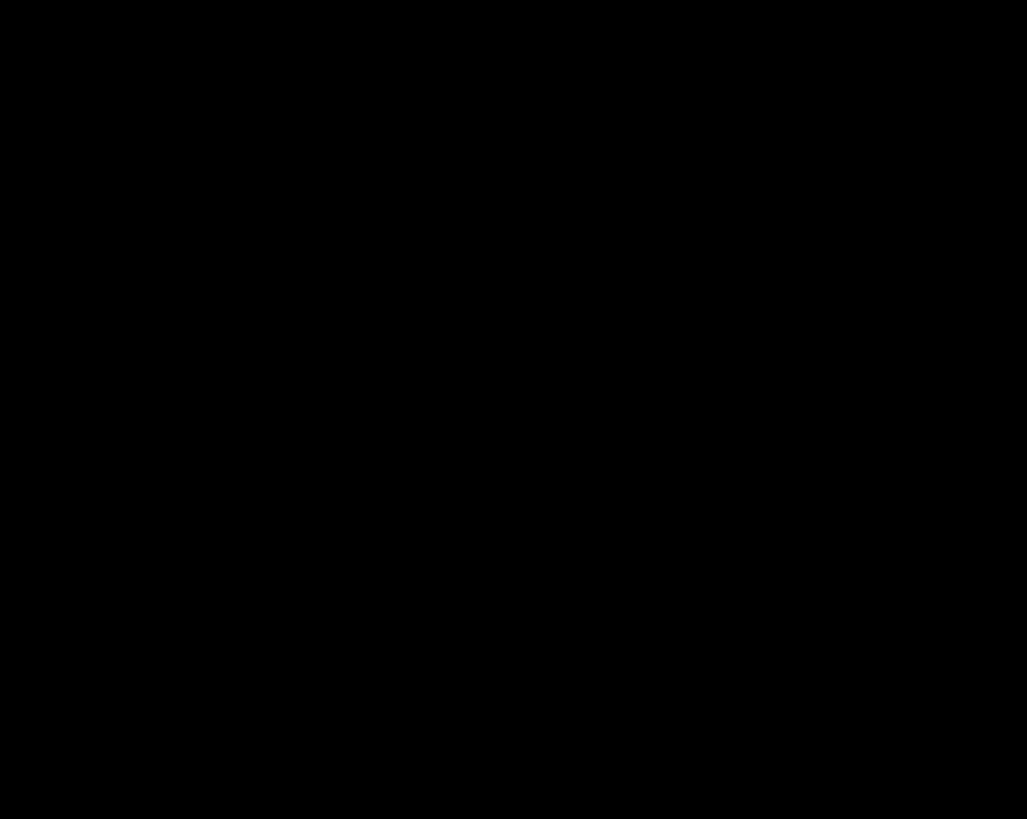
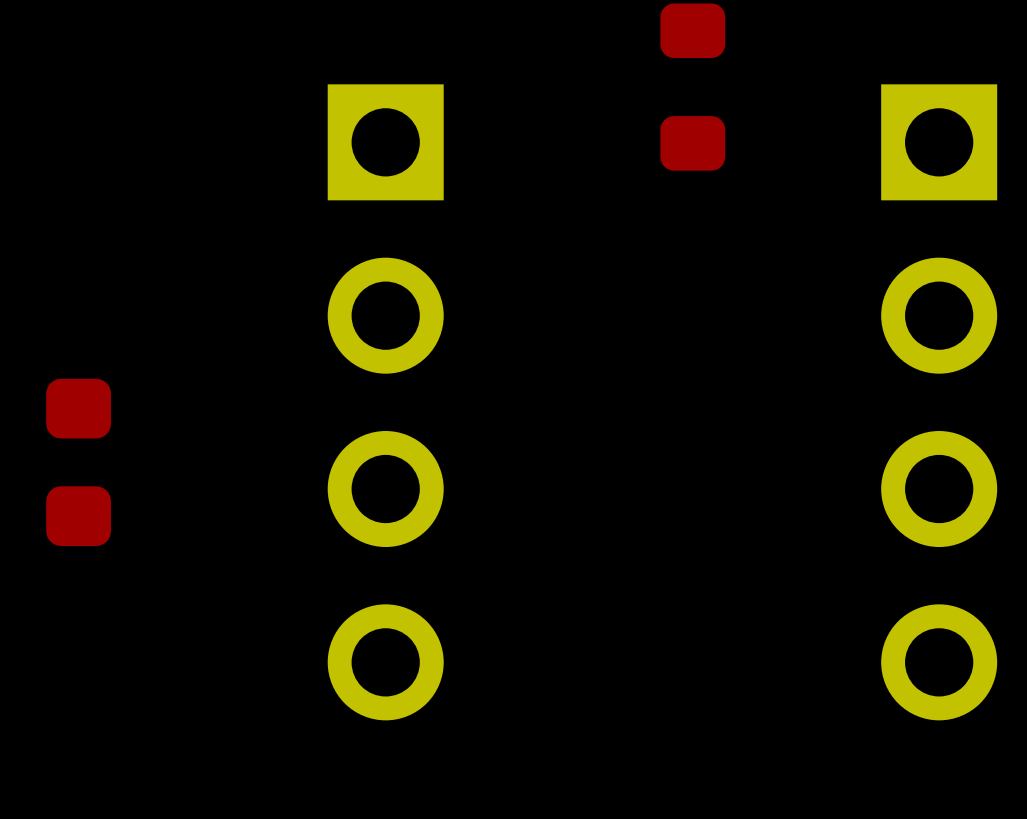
part: none -> (692, 87)
part: none -> (385, 402)
part: none -> (939, 402)
part: none -> (78, 462)

